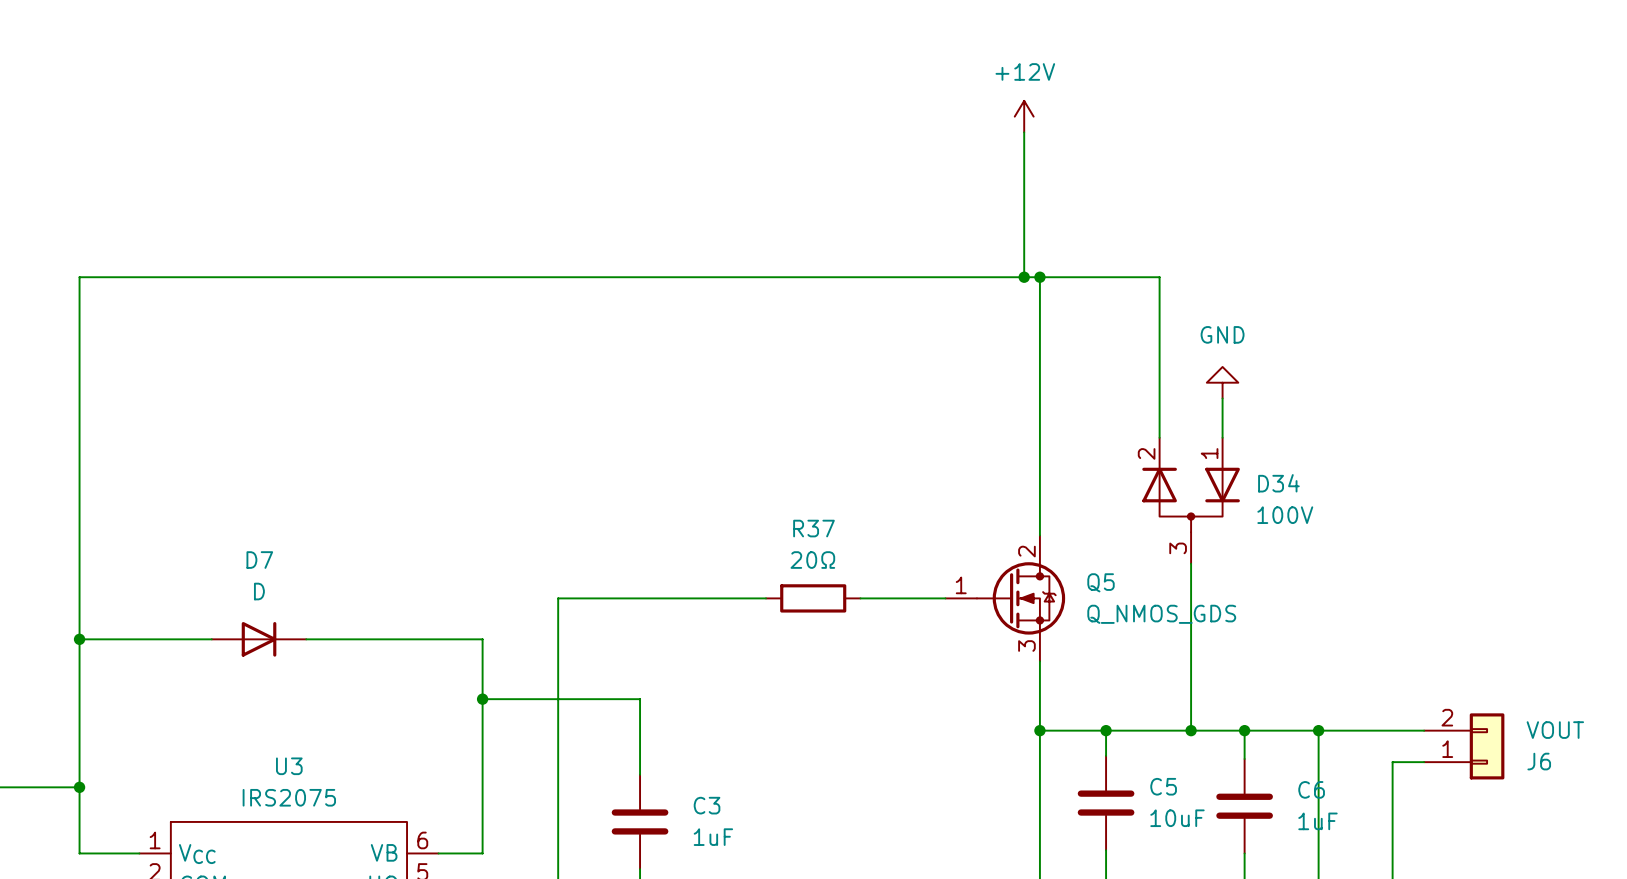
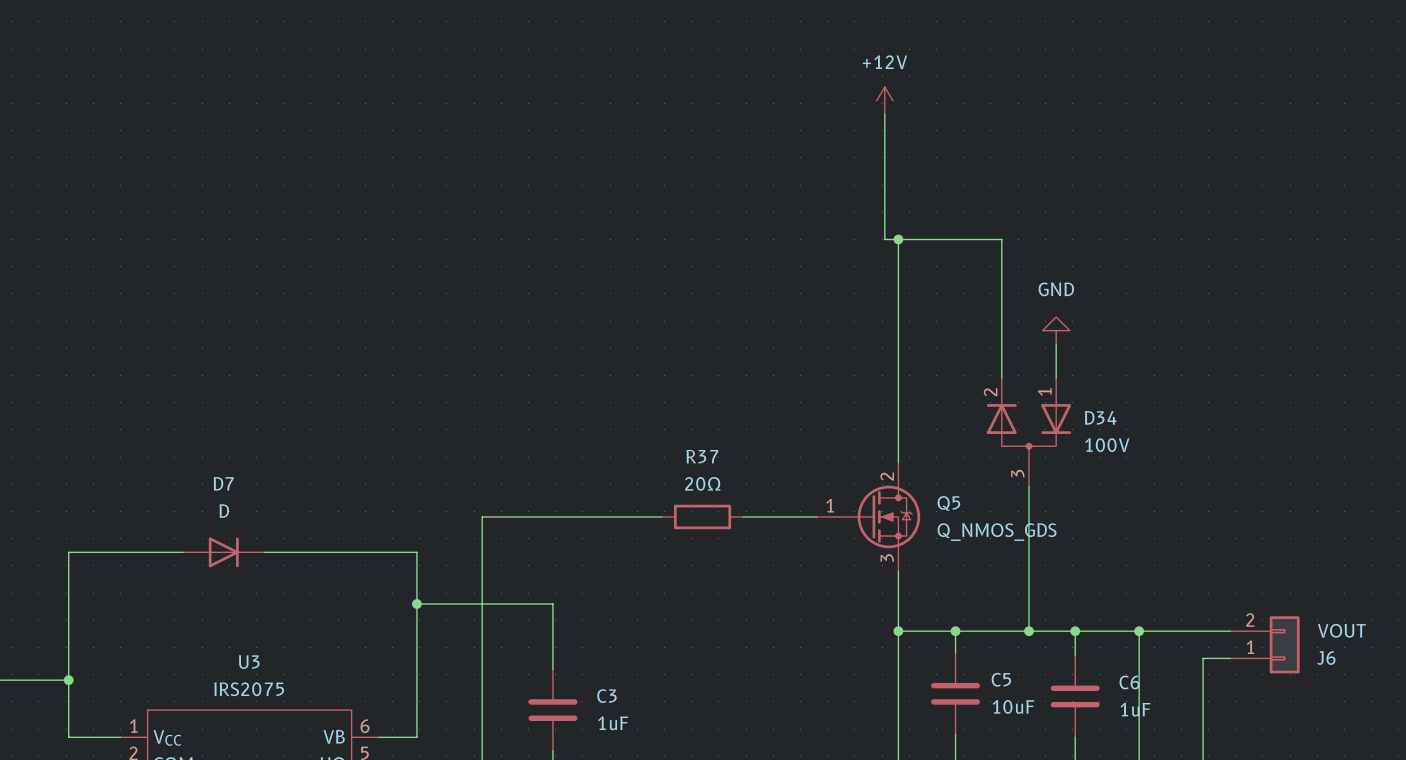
wire: (1024, 277) (79, 277) (79, 639) -> none
junction: (1024, 277) -> none
junction: (79, 639) -> none

